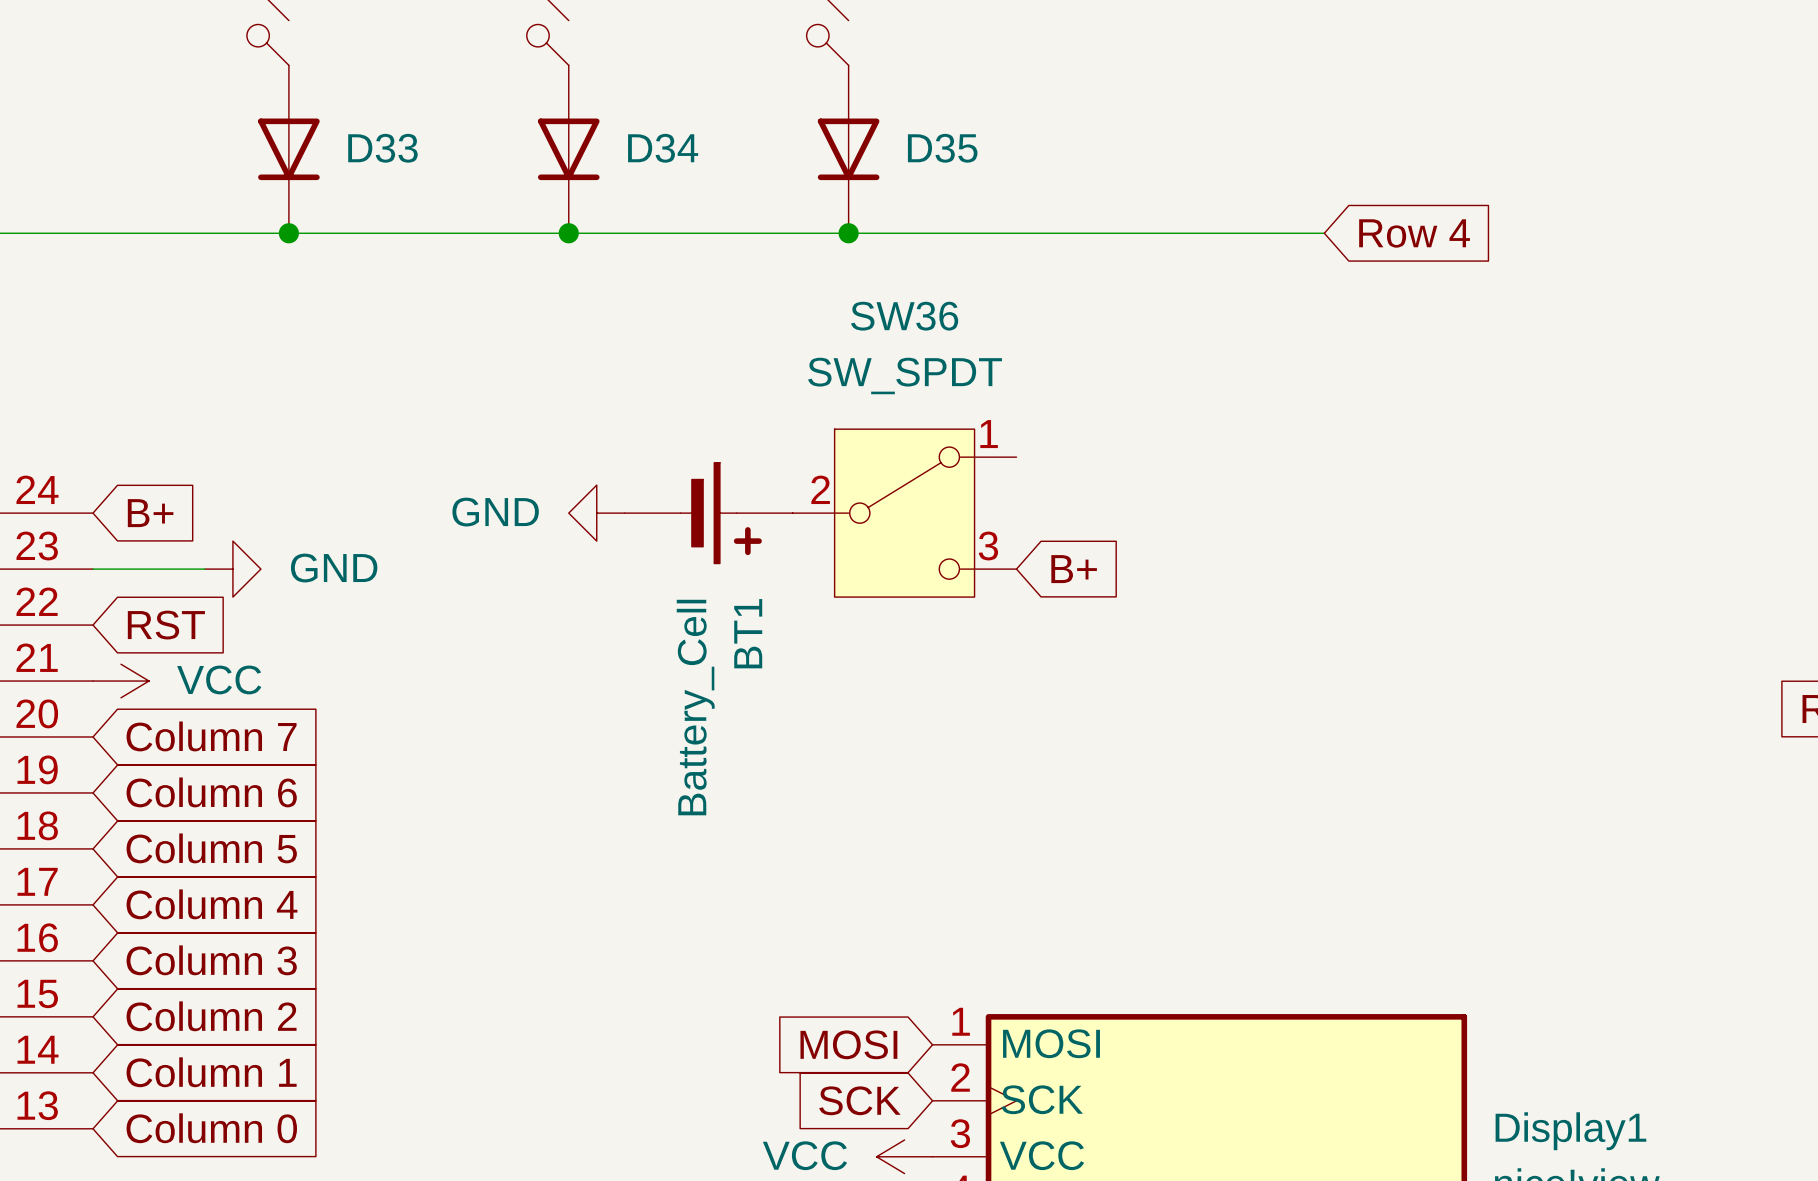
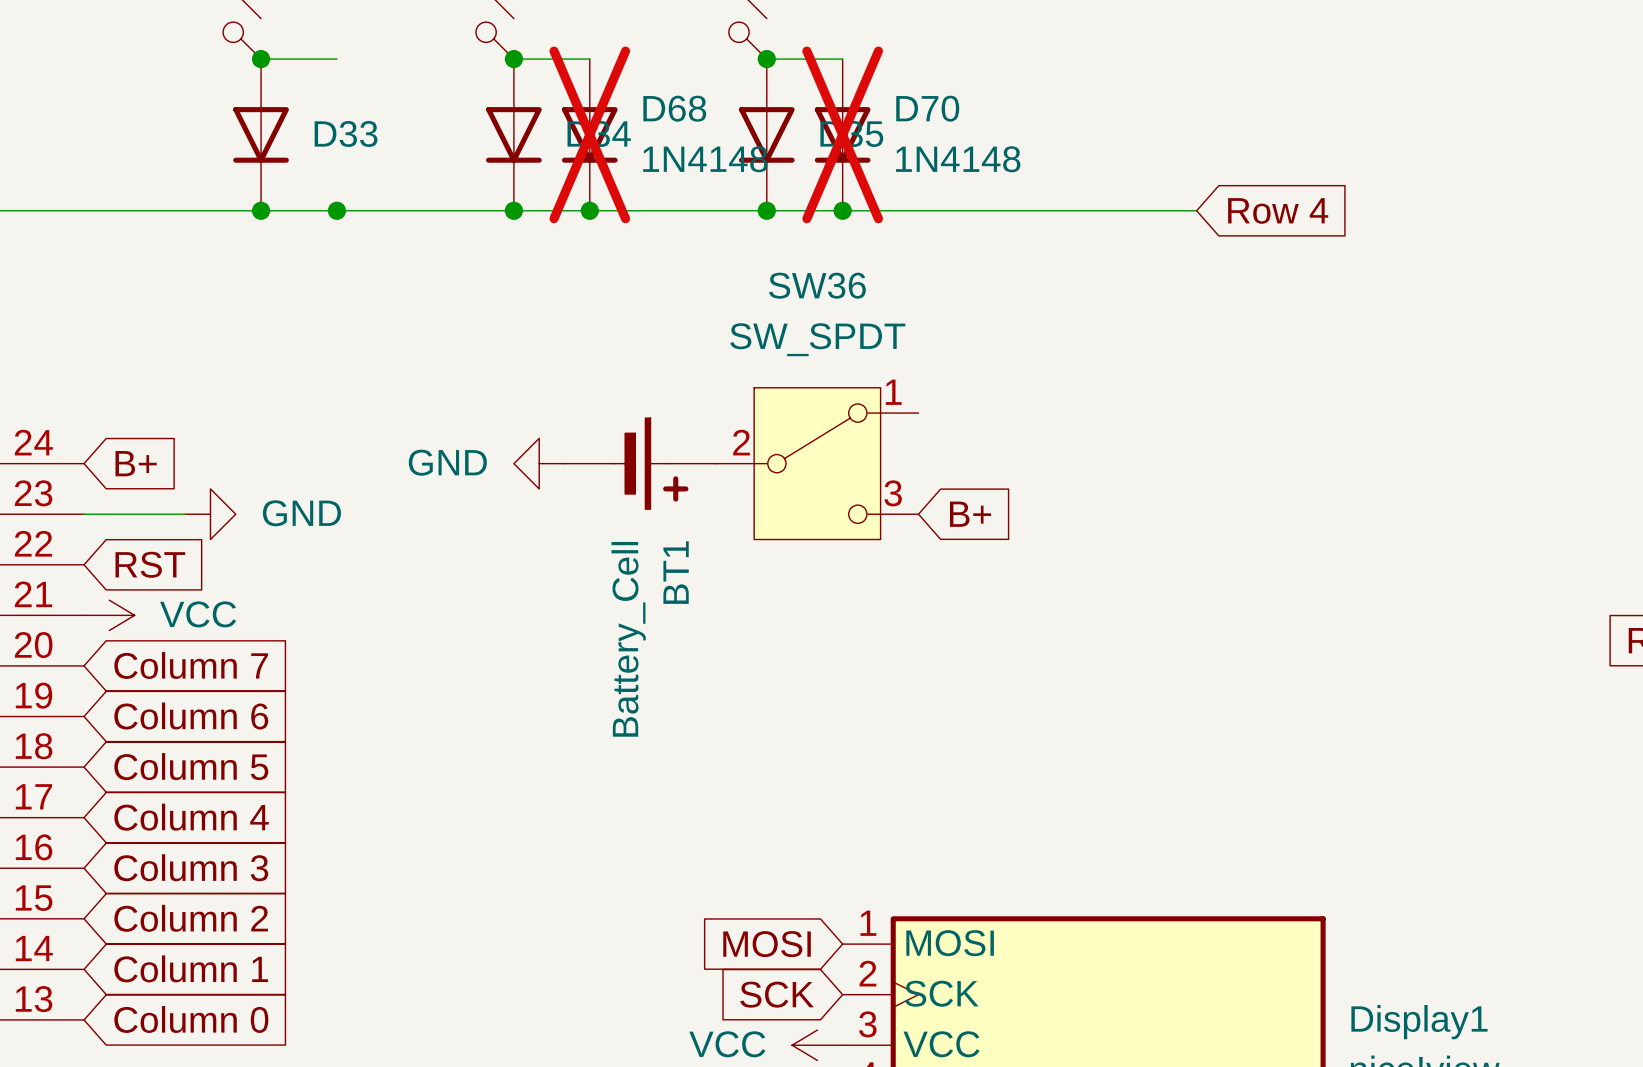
wire: none -> (261, 59) (336, 59)
junction: none -> (261, 59)
wire: none -> (513, 59) (589, 59)
junction: none -> (513, 59)
wire: none -> (766, 59) (842, 59)
junction: none -> (766, 59)
D68: none -> 1N4148 (589, 134)
D70: none -> 1N4148 (842, 134)
junction: none -> (336, 210)
junction: none -> (589, 210)
junction: none -> (842, 210)

